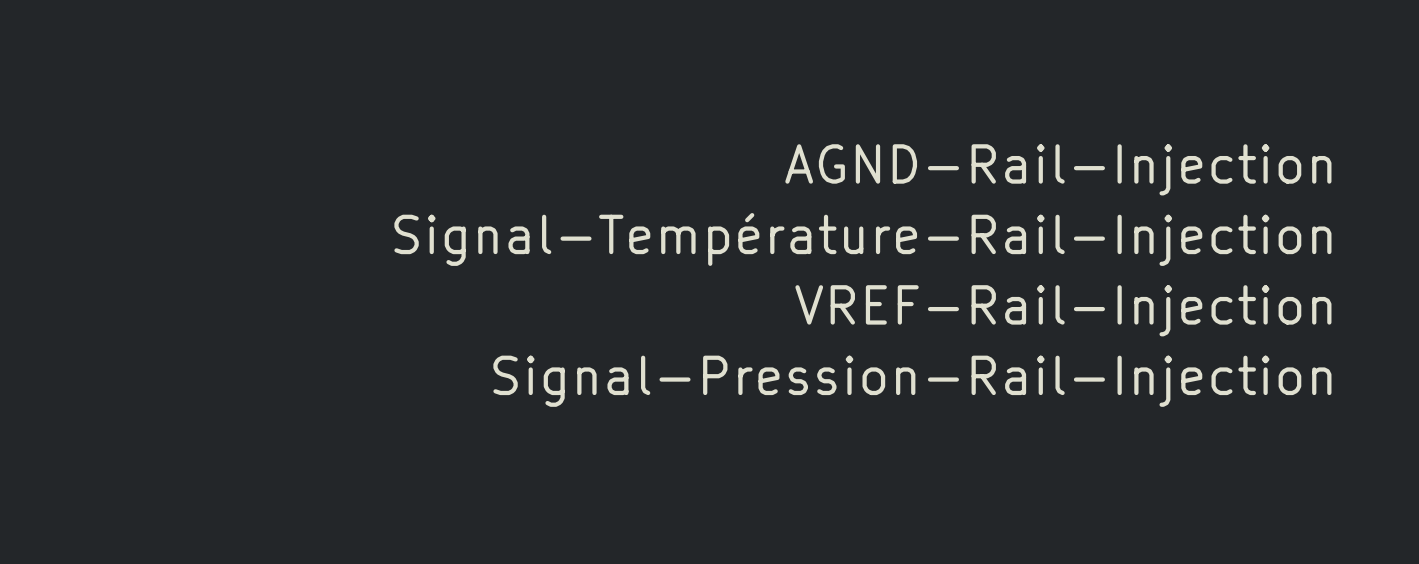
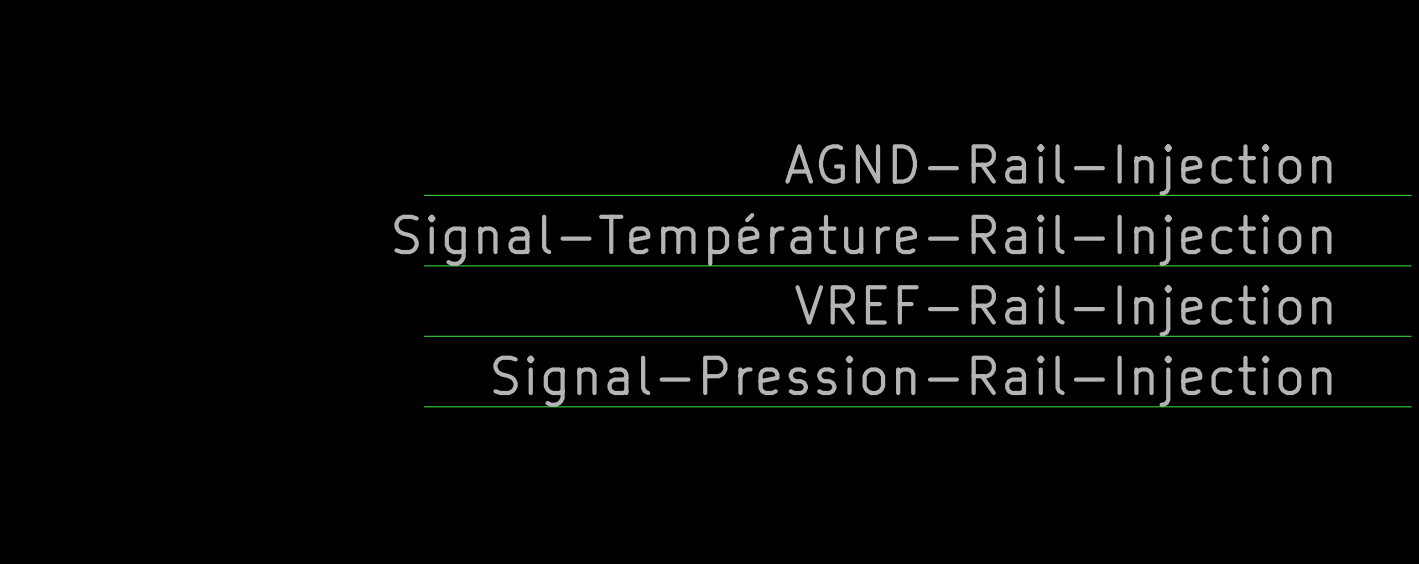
wire: none -> (424, 195) (1411, 195)
wire: none -> (424, 265) (1411, 265)
wire: none -> (424, 336) (1411, 336)
wire: none -> (424, 406) (1411, 406)

